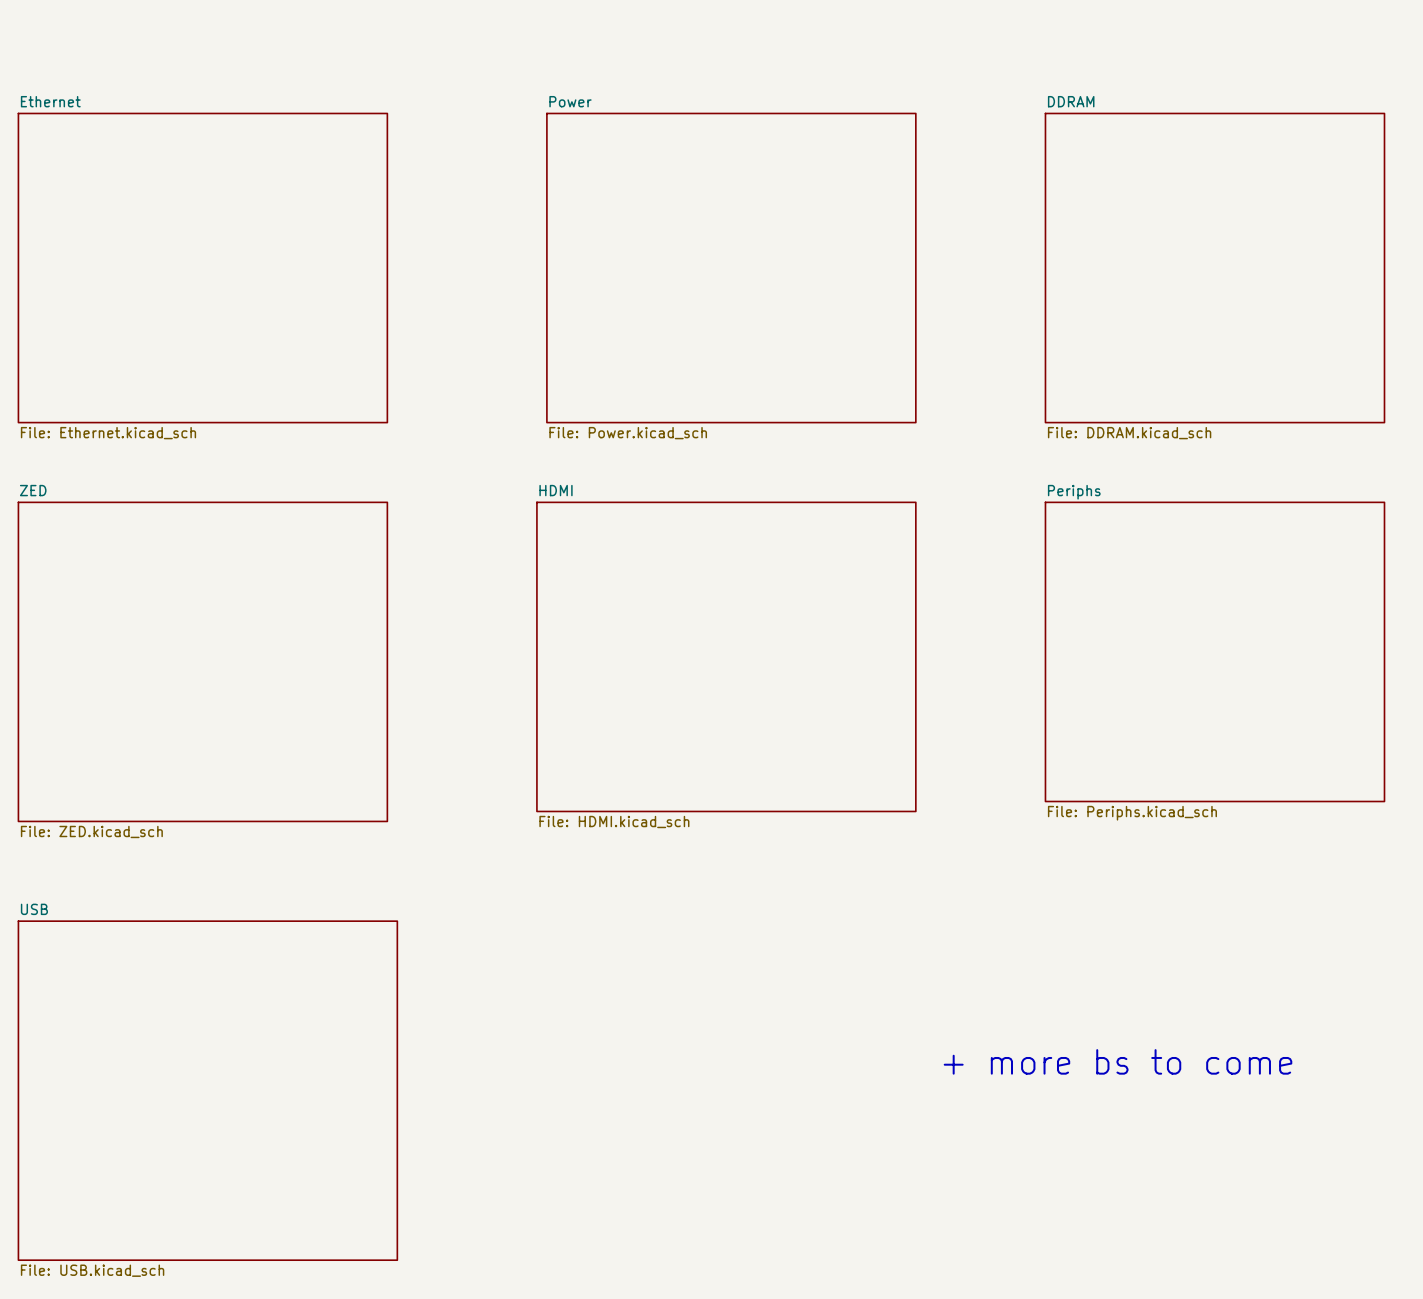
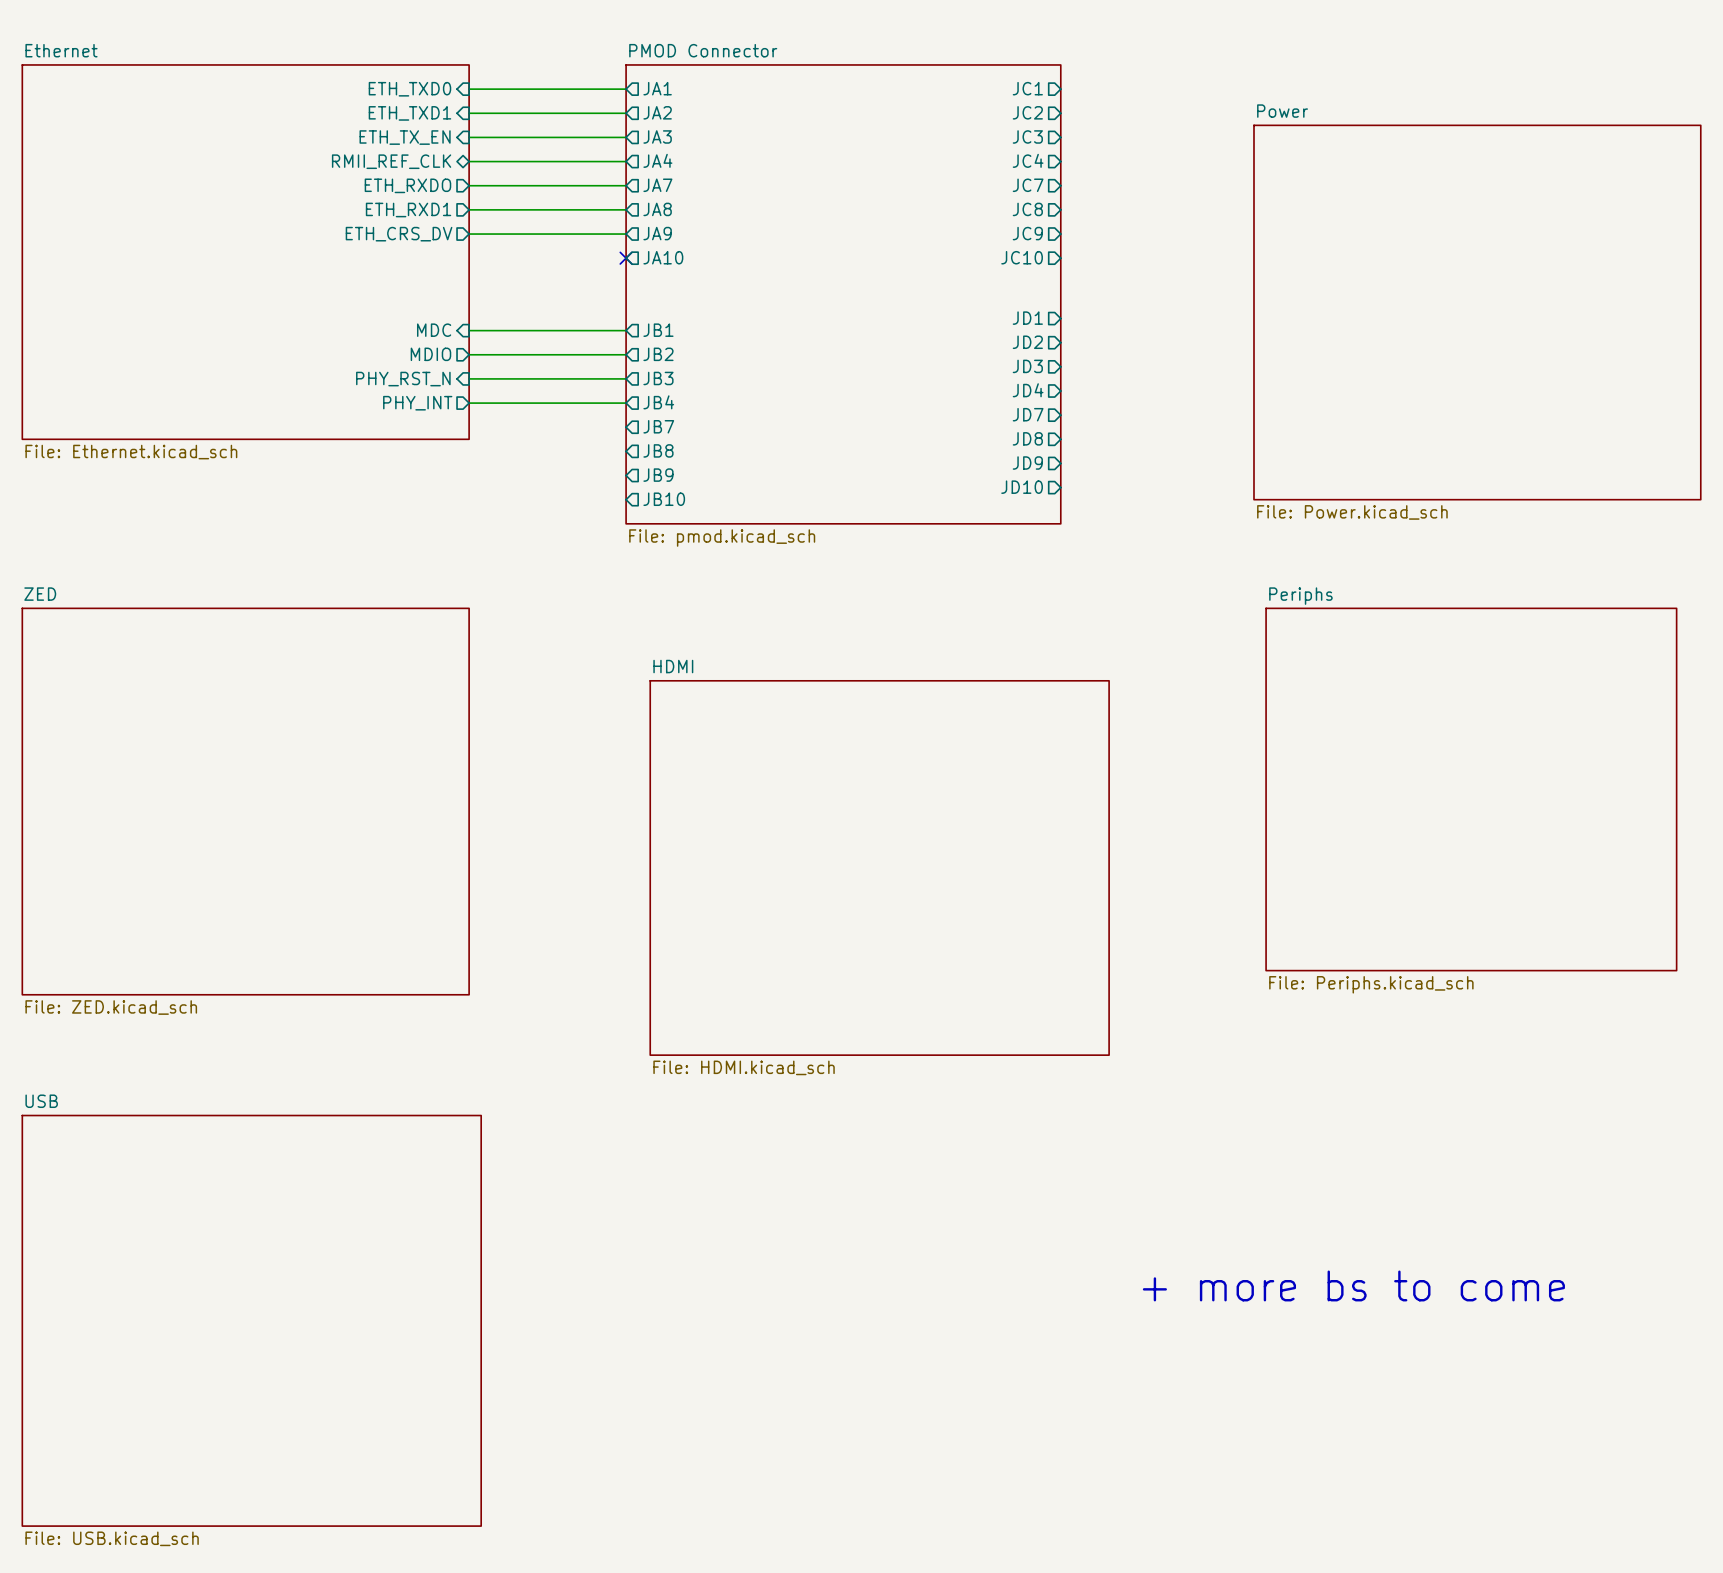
sheet pin: none -> ETH_TXD0 (409, 89)
wire: none -> (469, 89) (626, 89)
sheet pin: none -> JA1 (657, 88)
sheet pin: none -> JC1 (1027, 88)
sheet pin: none -> ETH_TXD1 (409, 113)
wire: none -> (469, 113) (626, 113)
sheet pin: none -> JA2 (657, 112)
sheet pin: none -> JC2 (1027, 112)
sheet pin: none -> ETH_TX_EN (405, 137)
wire: none -> (469, 137) (626, 137)
sheet pin: none -> JA3 (657, 136)
sheet pin: none -> JC3 (1027, 136)
sheet pin: none -> JA4 (657, 160)
sheet pin: none -> JC4 (1028, 160)
sheet pin: none -> RMII_REF_CLK (391, 161)
wire: none -> (469, 161) (626, 161)
sheet pin: none -> JA7 (657, 185)
sheet pin: none -> JC7 (1028, 185)
sheet pin: none -> ETH_RXDO (407, 185)
wire: none -> (469, 185) (626, 185)
sheet pin: none -> JA8 (657, 209)
sheet pin: none -> JC8 (1027, 209)
sheet pin: none -> ETH_RXD1 (408, 210)
wire: none -> (469, 209) (626, 209)
sheet pin: none -> JA9 (657, 233)
sheet pin: none -> JC9 (1027, 233)
sheet pin: none -> ETH_CRS_DV (399, 234)
wire: none -> (469, 234) (626, 234)
sheet pin: none -> JA10 (663, 257)
sheet pin: none -> JC10 (1022, 257)
no-connect mark: none -> (626, 258)
sheet PMOD Connector: none -> File: pmod.kicad_sch (843, 294)
sheet Power: none -> File: Power.kicad_sch (1477, 312)
sheet pin: none -> JD1 (1027, 318)
sheet Ethernet position: (202, 268) -> (245, 252)
sheet Power: File: Power.kicad_sch (731, 268) -> none
sheet DDRAM: File: DDRAM.kicad_sch (1214, 268) -> none
sheet pin: none -> MDC (434, 330)
sheet pin: none -> JB1 (658, 330)
wire: none -> (469, 330) (626, 330)
sheet pin: none -> JD2 (1027, 342)
sheet pin: none -> MDIO (430, 354)
wire: none -> (469, 354) (626, 354)
sheet pin: none -> JB2 (658, 354)
sheet pin: none -> JD3 (1027, 366)
wire: none -> (469, 378) (626, 378)
sheet pin: none -> JB3 (658, 378)
sheet pin: none -> PHY_RST_N (403, 379)
sheet pin: none -> JD4 (1028, 390)
sheet pin: none -> PHY_INT (417, 403)
wire: none -> (469, 403) (626, 403)
sheet pin: none -> JB4 (658, 402)
sheet pin: none -> JD7 (1028, 414)
sheet pin: none -> JB7 (658, 426)
sheet pin: none -> JD8 (1027, 438)
sheet pin: none -> JB8 (658, 450)
sheet pin: none -> JD9 (1027, 463)
sheet pin: none -> JB9 (658, 475)
sheet pin: none -> JD10 (1022, 487)
sheet pin: none -> JB10 (664, 499)
sheet HDMI position: (726, 656) -> (879, 867)

